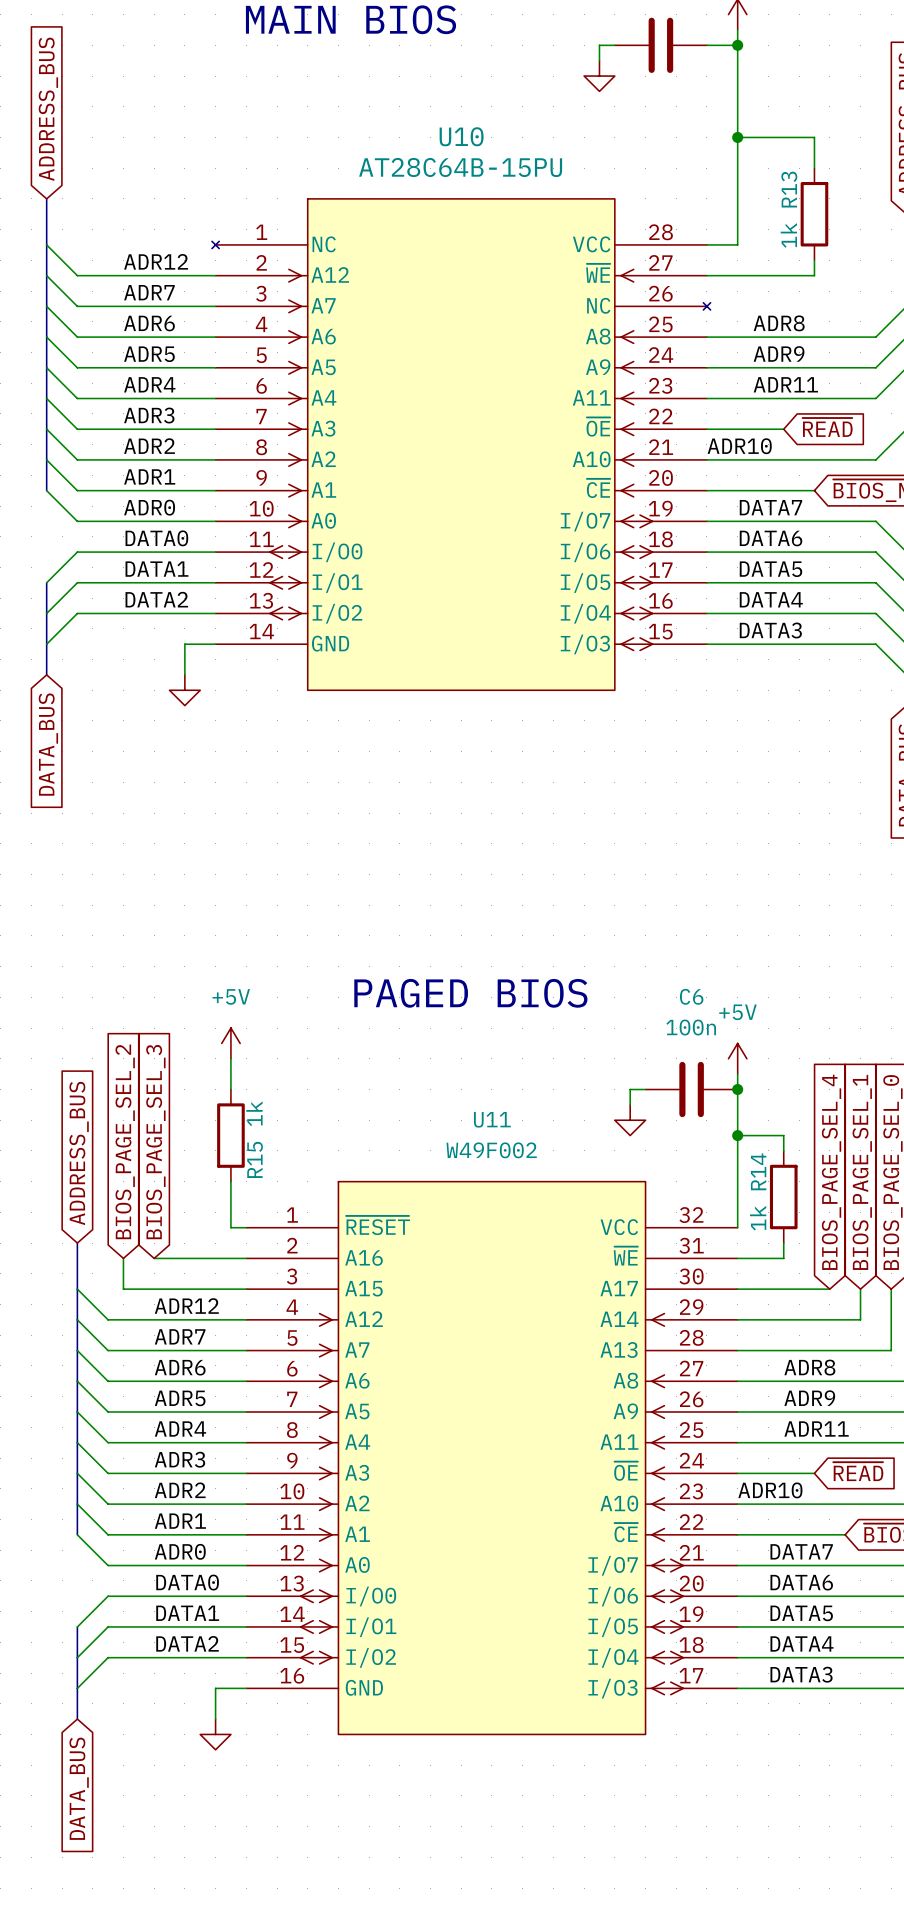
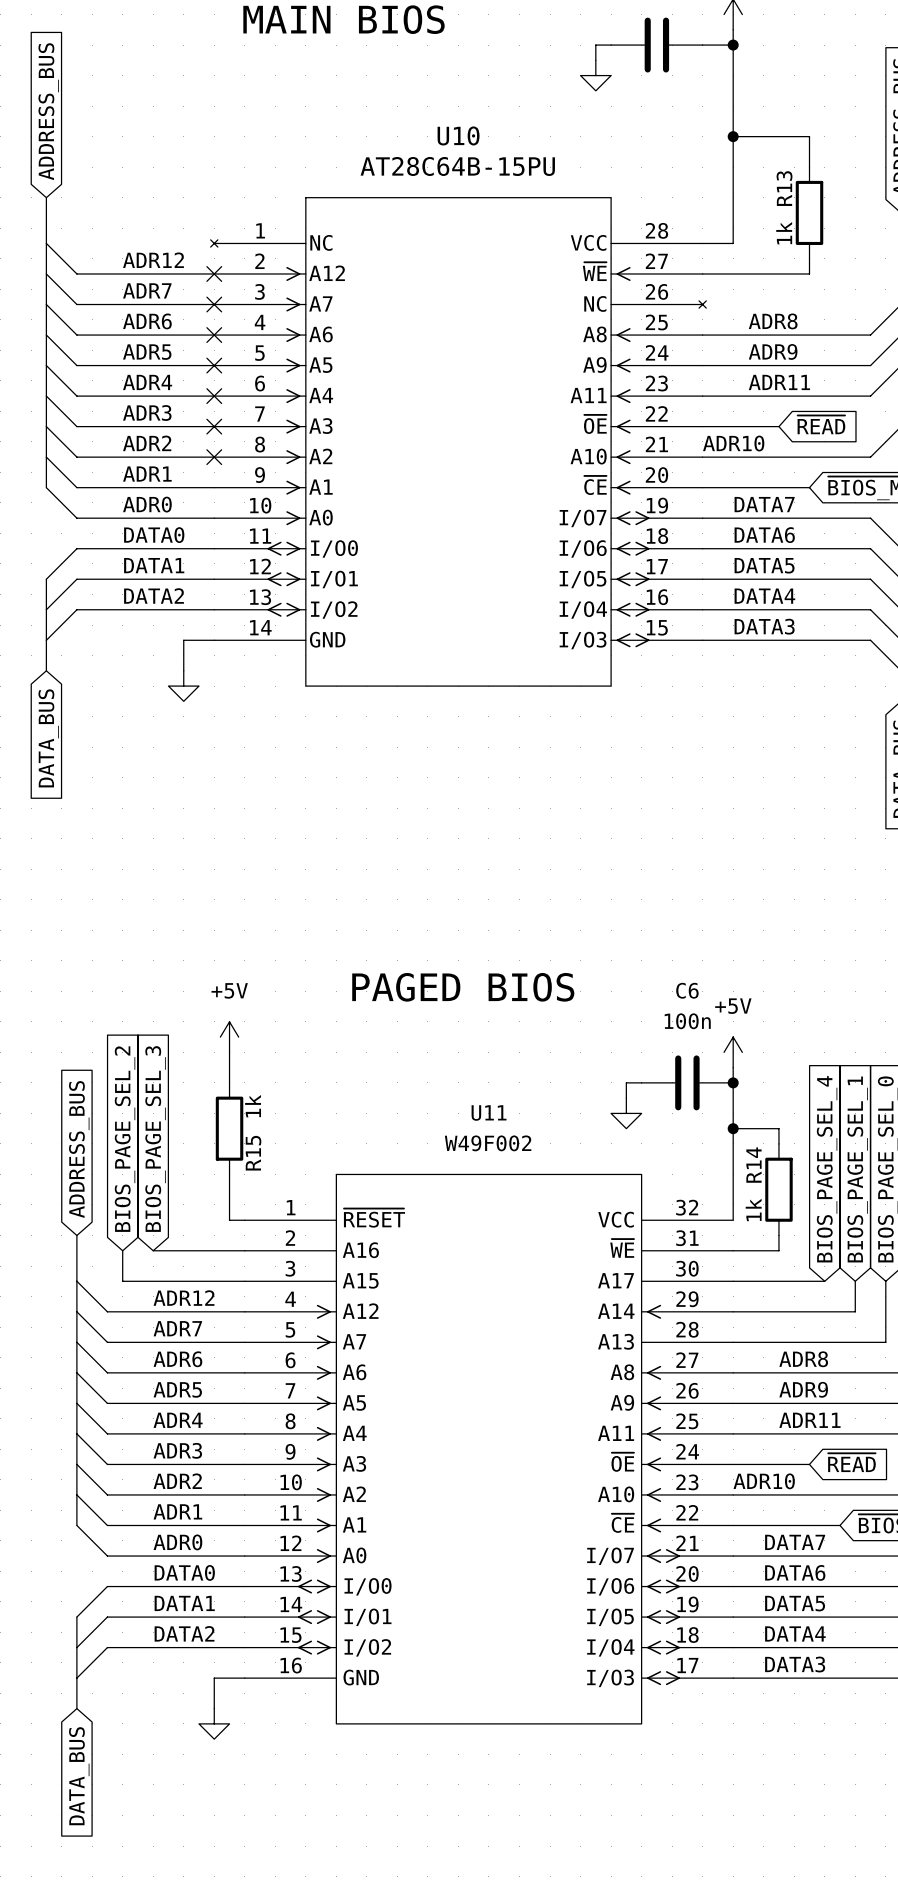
no-connect mark: none -> (214, 273)
no-connect mark: none -> (214, 304)
no-connect mark: none -> (214, 335)
no-connect mark: none -> (214, 365)
no-connect mark: none -> (214, 396)
no-connect mark: none -> (214, 426)
no-connect mark: none -> (214, 457)

